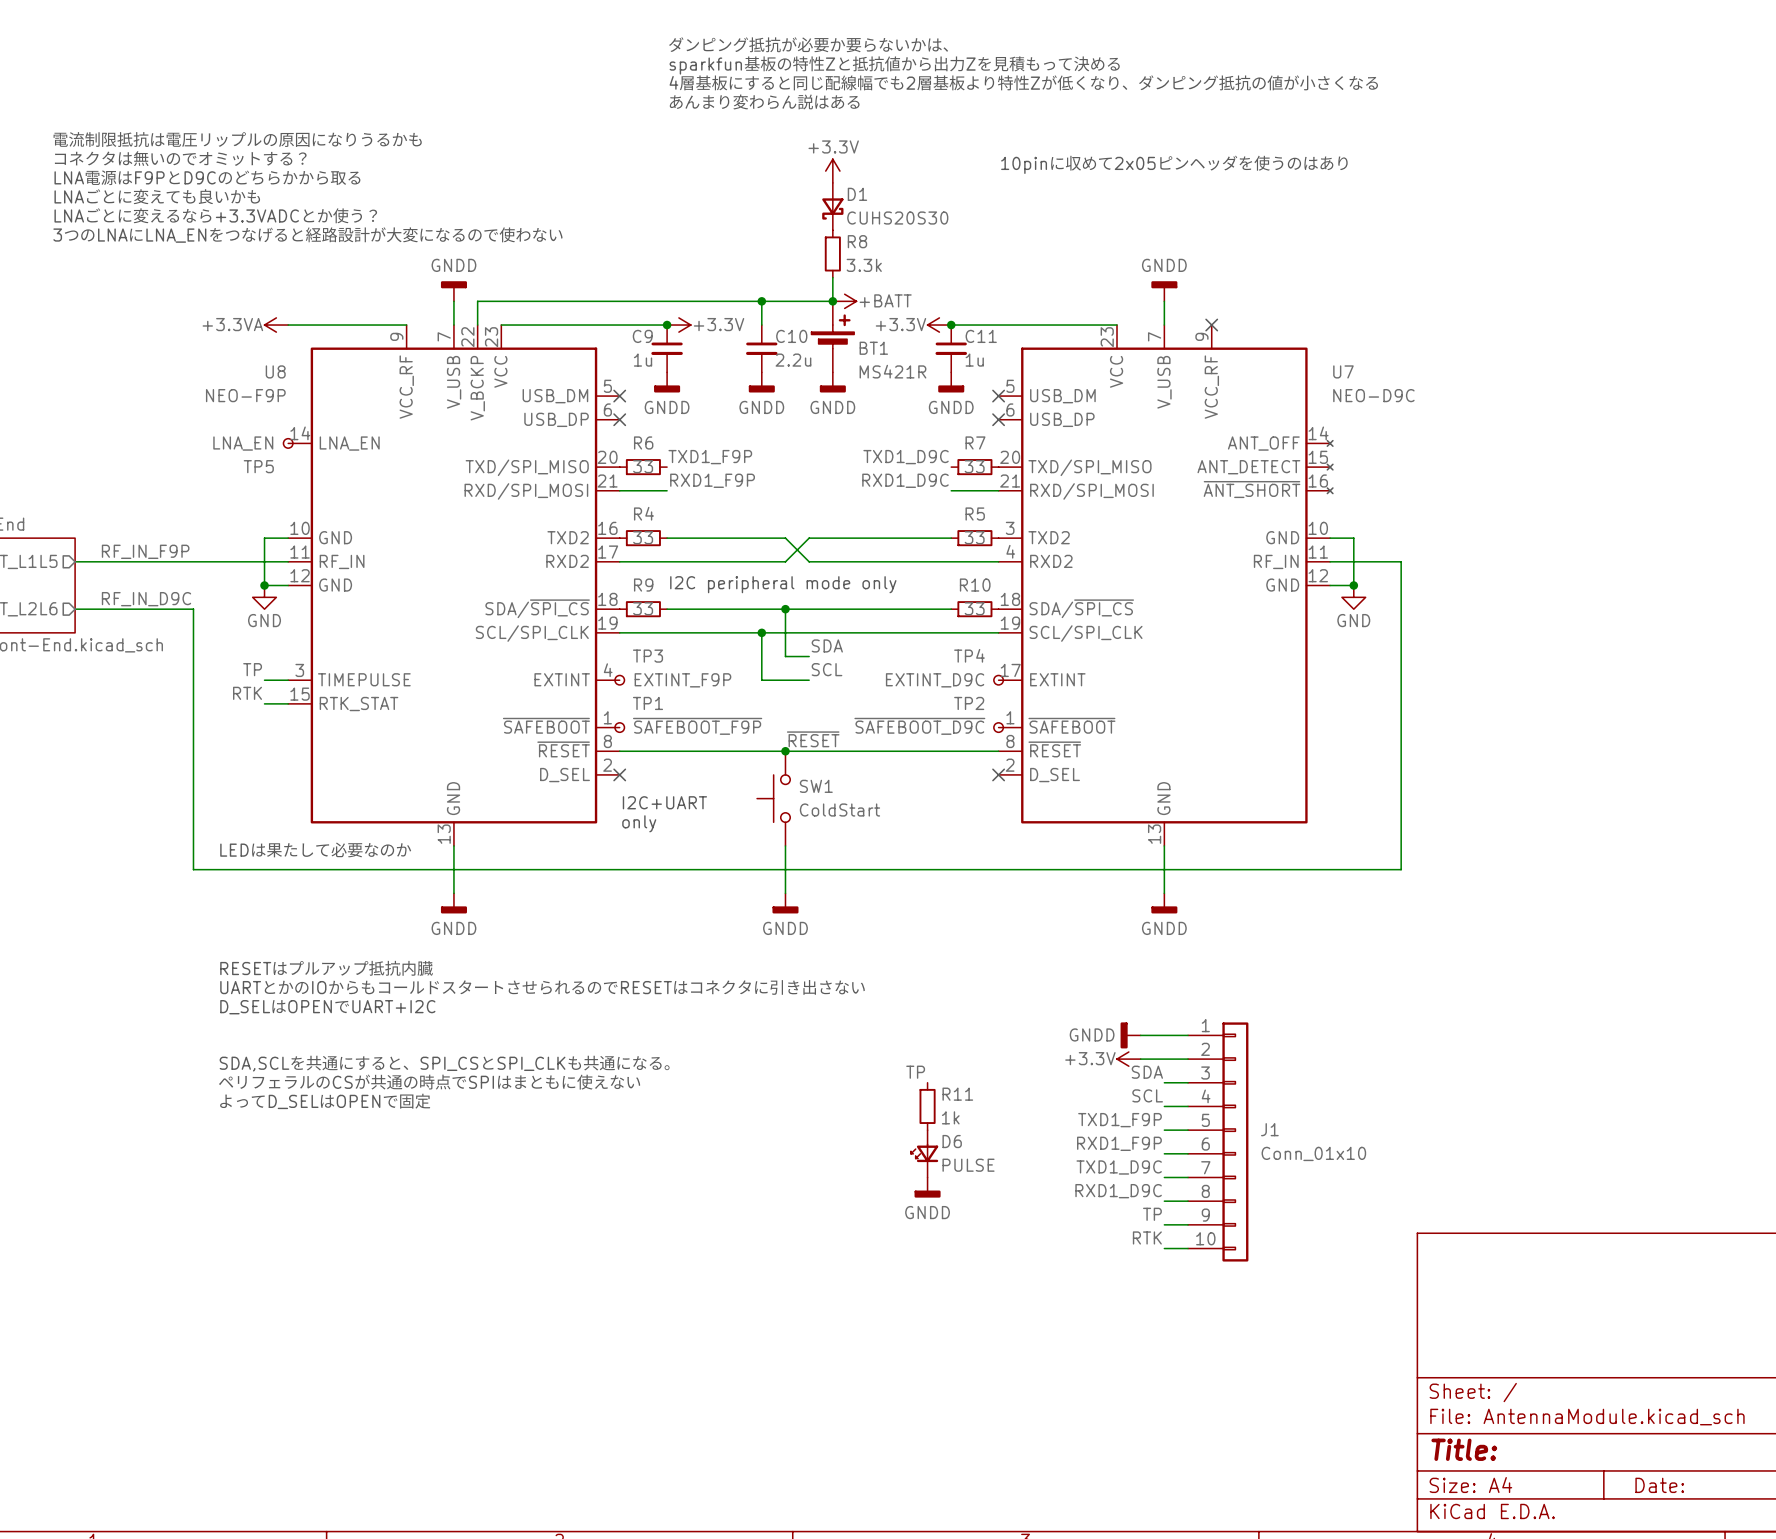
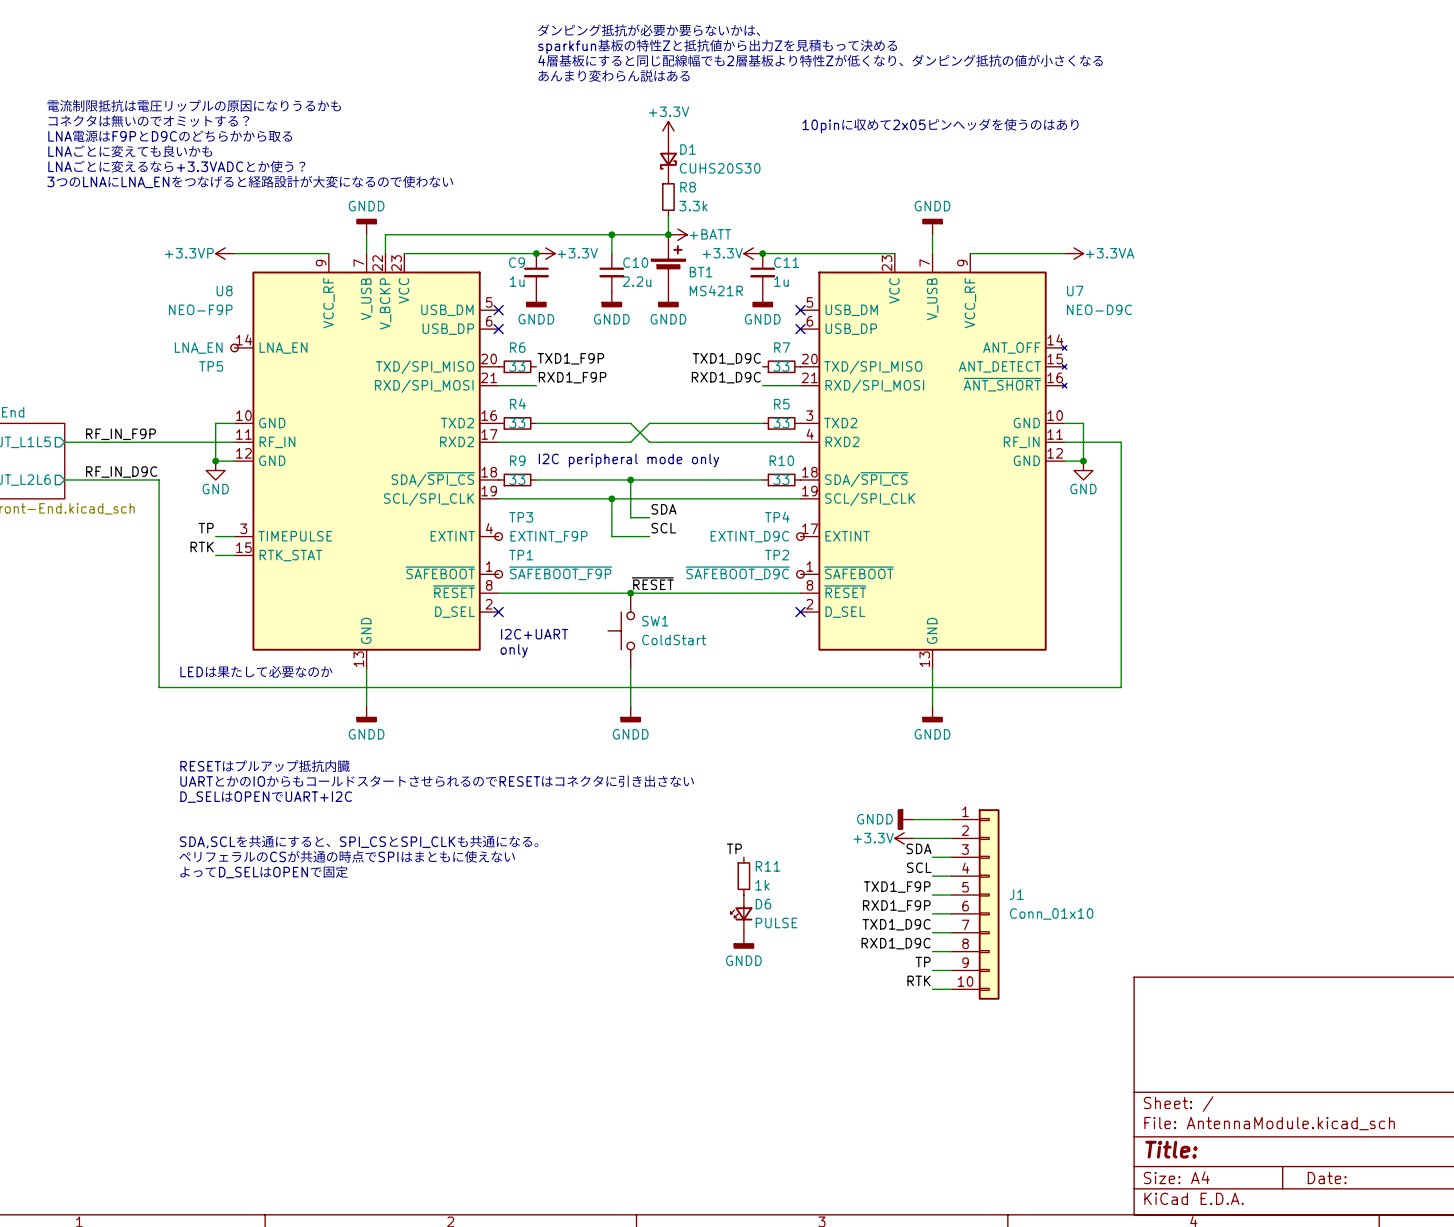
power symbol: +3.3VA (276, 325) -> +3.3VP (225, 253)
wire: none -> (970, 253) (1064, 253)
no-connect mark: (1211, 325) -> none
power symbol: none -> +3.3VA (1074, 253)

